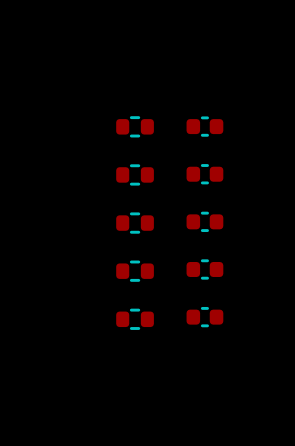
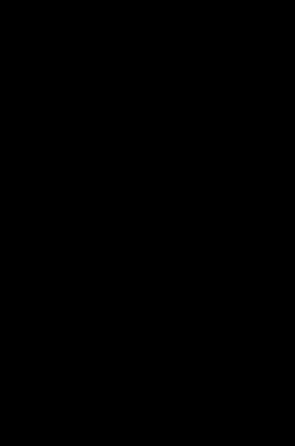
part: (135, 126) -> none
part: (204, 126) -> none
part: (135, 174) -> none
part: (204, 174) -> none
part: (204, 221) -> none
part: (135, 223) -> none
part: (204, 269) -> none
part: (135, 271) -> none
part: (204, 317) -> none
part: (135, 319) -> none

